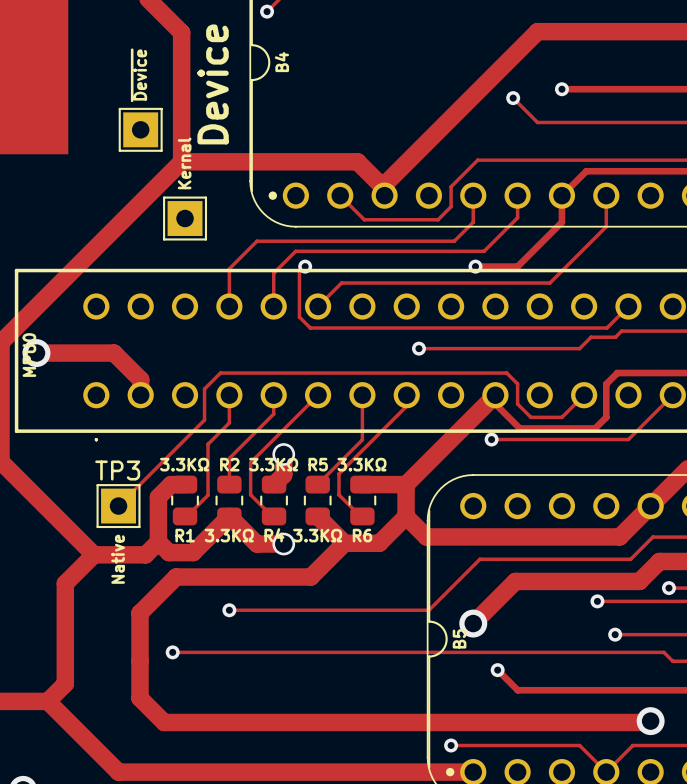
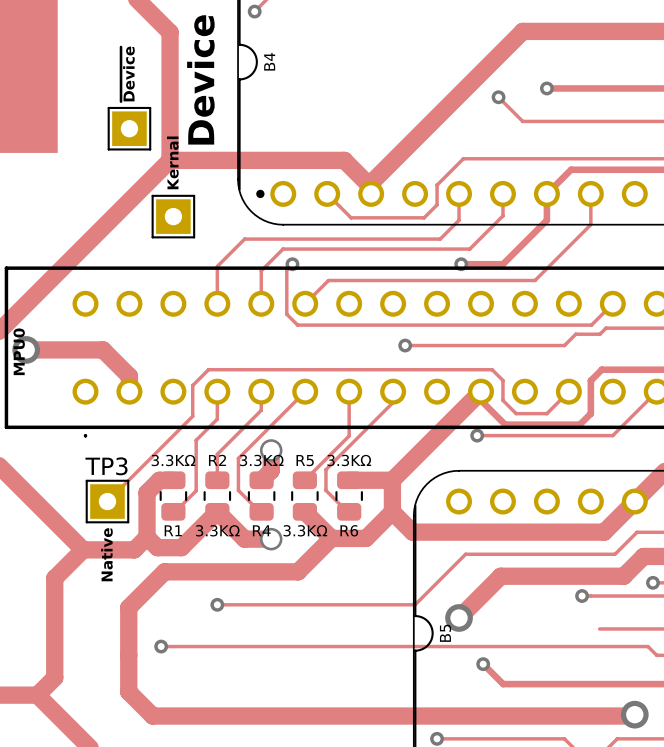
via: (615, 634) -> none

